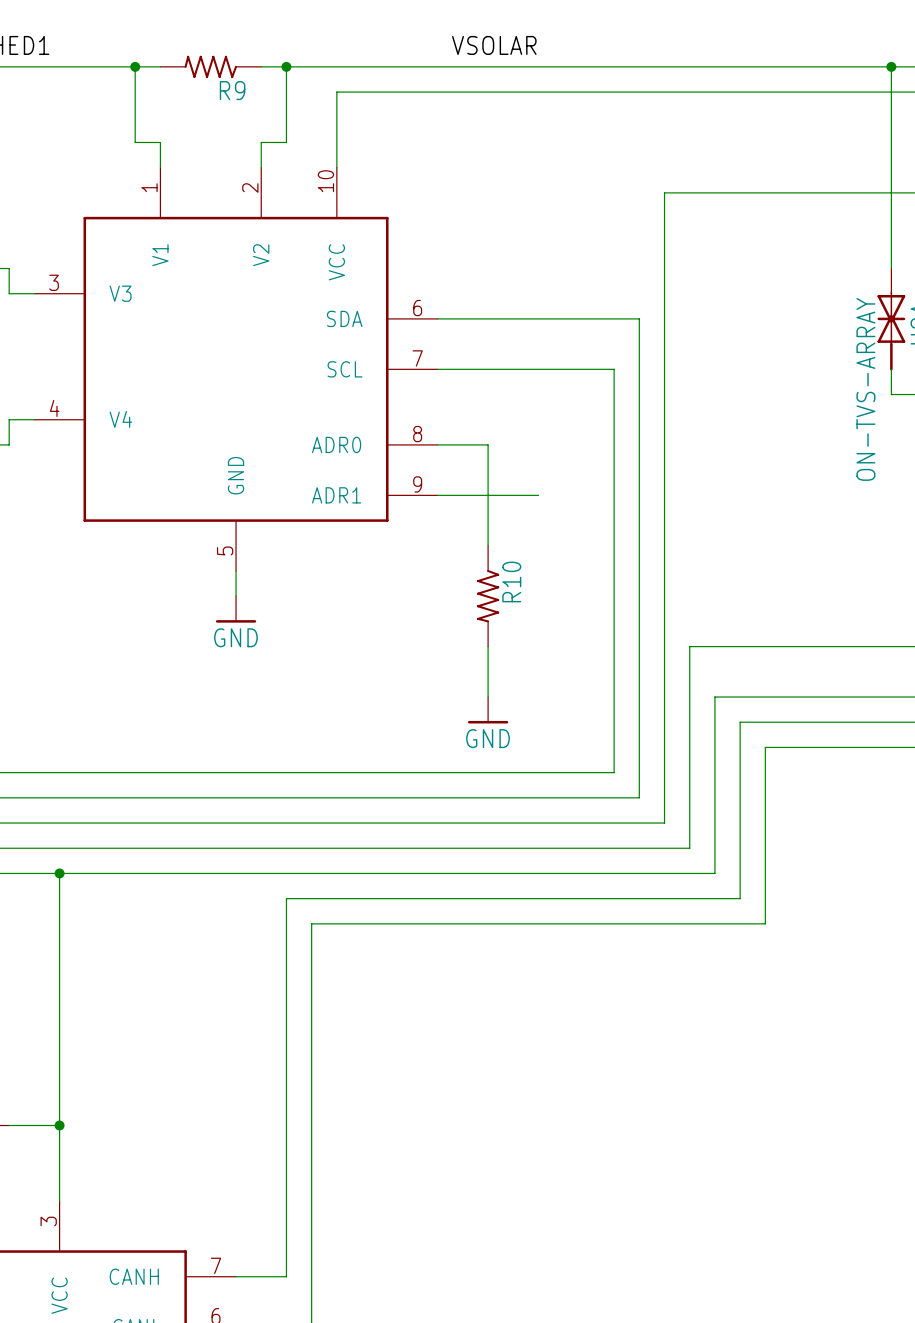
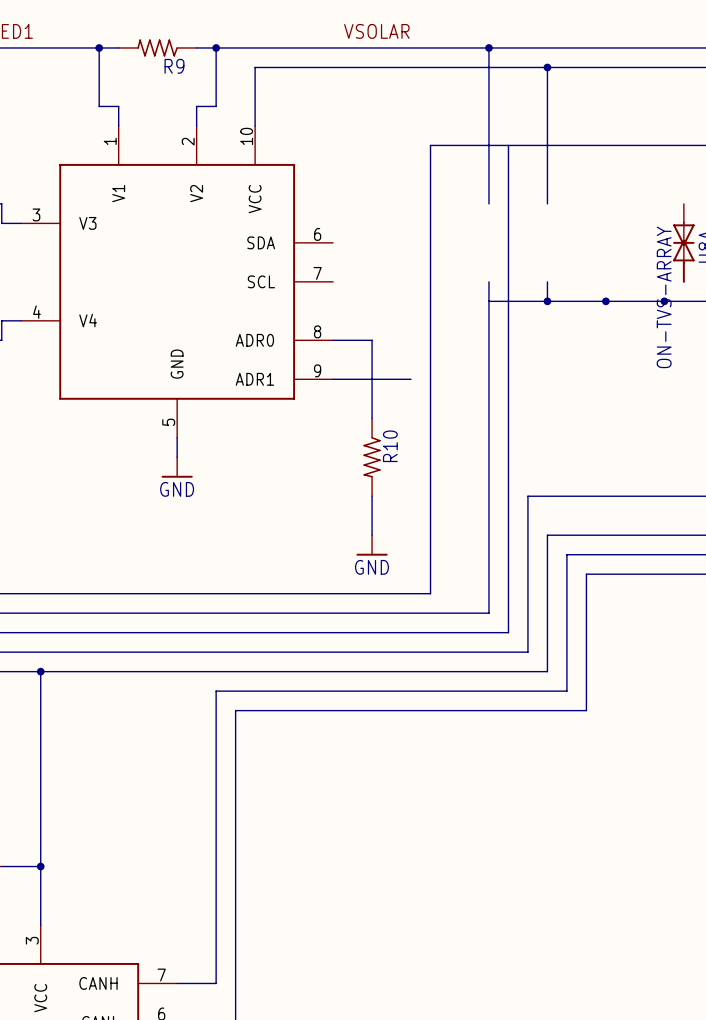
wire: none -> (488, 47) (488, 203)
junction: none -> (488, 47)
wire: (891, 66) (891, 268) -> none
junction: (891, 66) -> none
wire: none -> (547, 67) (547, 203)
junction: none -> (547, 67)
wire: (437, 318) (639, 318) (639, 369) -> none
wire: (437, 369) (614, 369) (614, 772) (563, 772) -> (508, 145) (430, 145) (430, 593)
wire: none -> (547, 281) (547, 301)
wire: (891, 369) (891, 394) -> (488, 301) (683, 301)
junction: none -> (547, 301)
junction: none -> (605, 301)
junction: none -> (664, 301)

